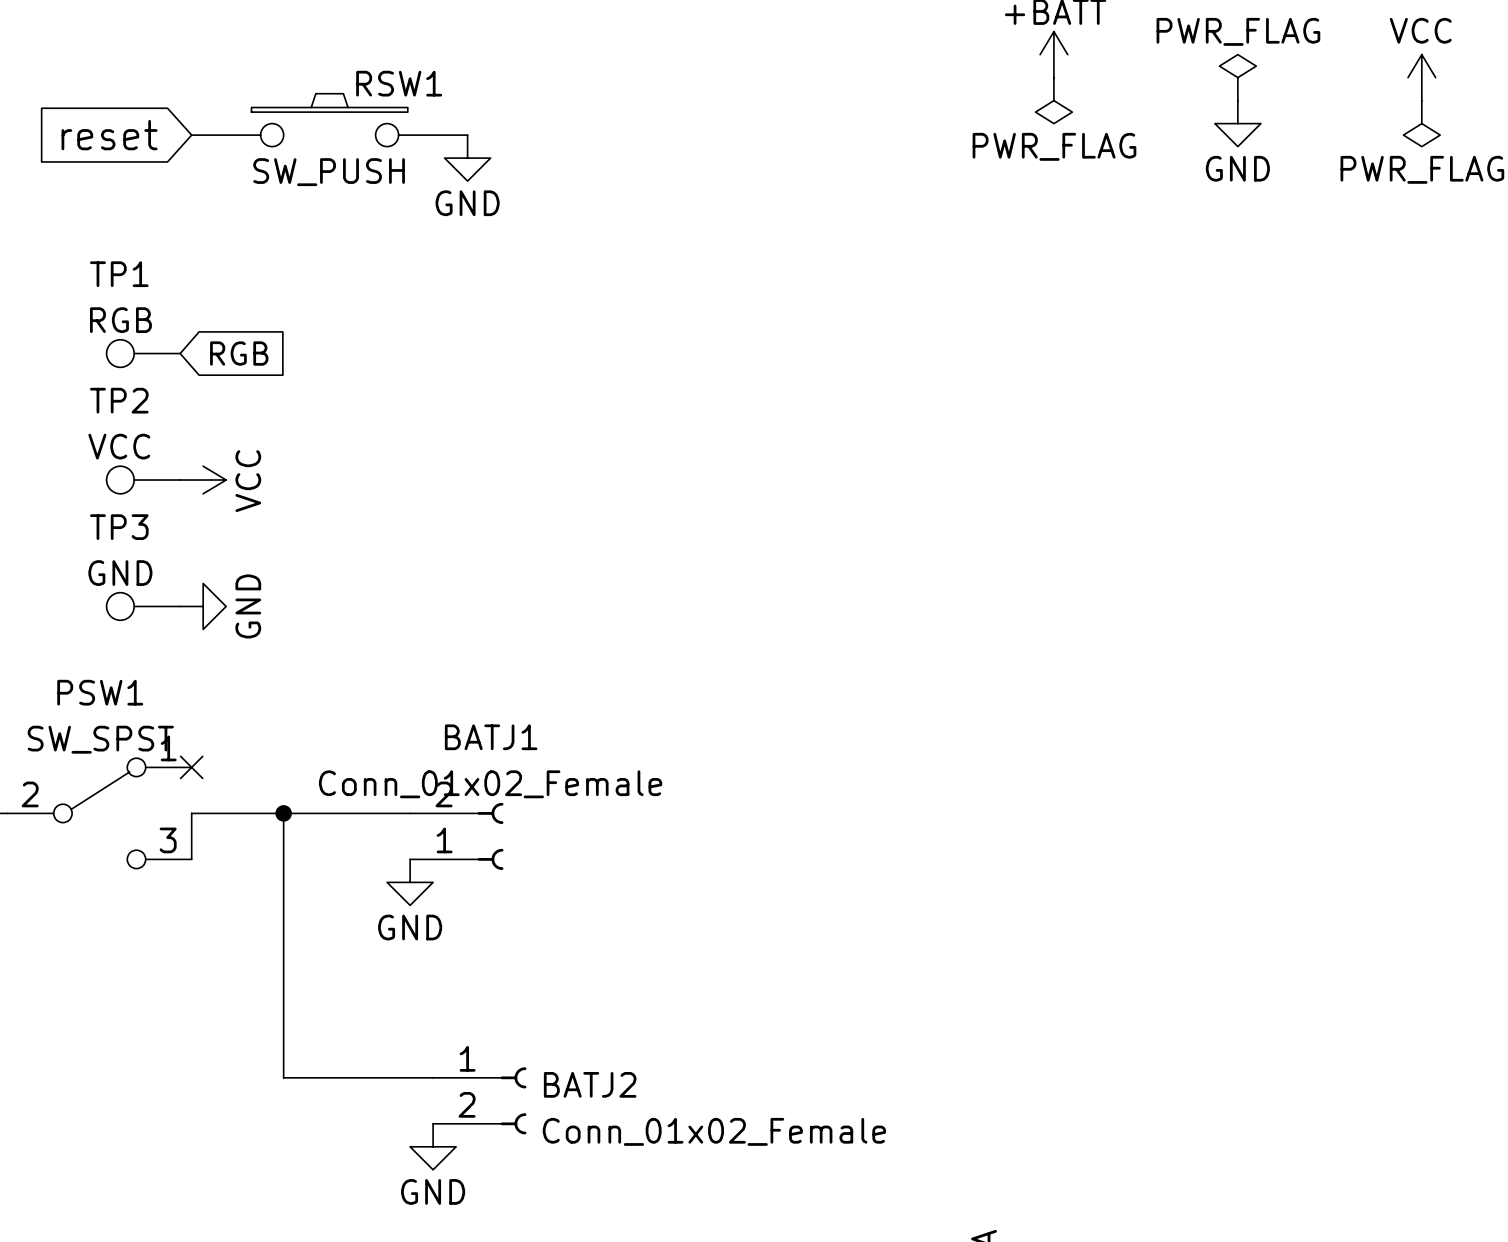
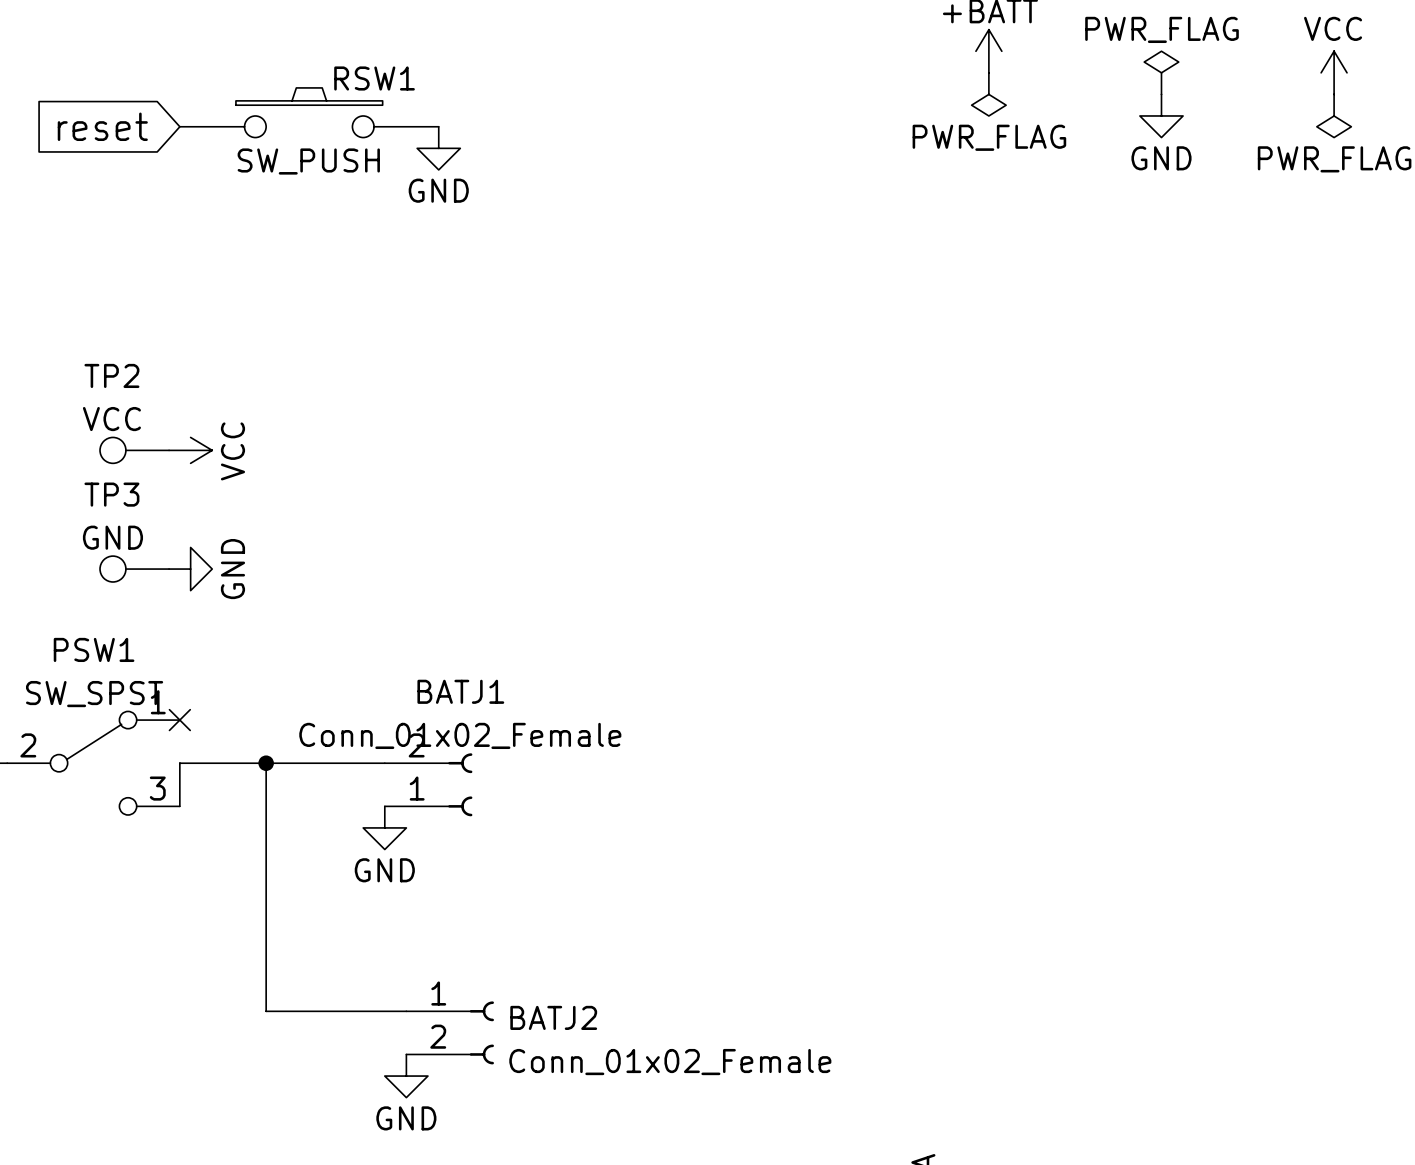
TP1: RGB (143, 353) -> none
global label: RGB (239, 353) -> none

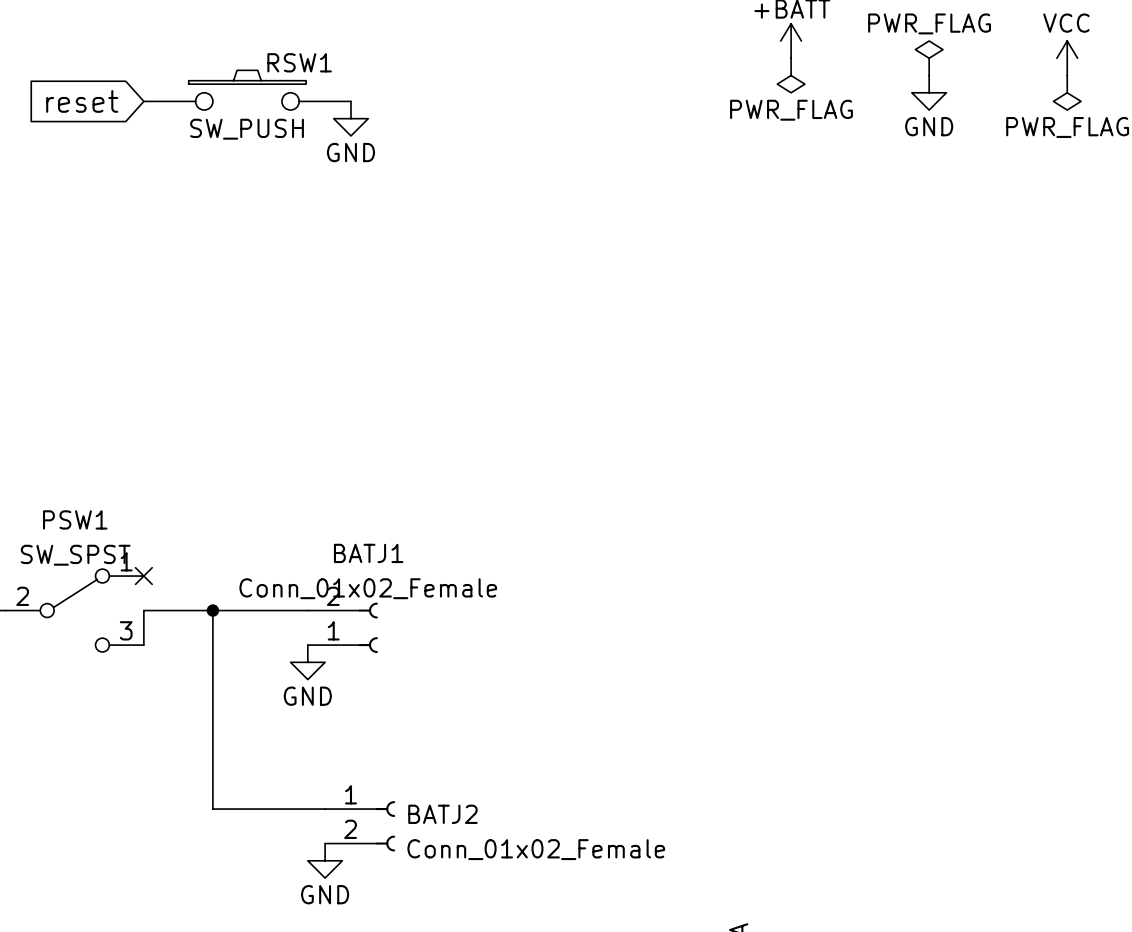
TP2: VCC (134, 450) -> none
power symbol: VCC (190, 450) -> none
TP3: GND (134, 569) -> none
power symbol: GND (190, 569) -> none

